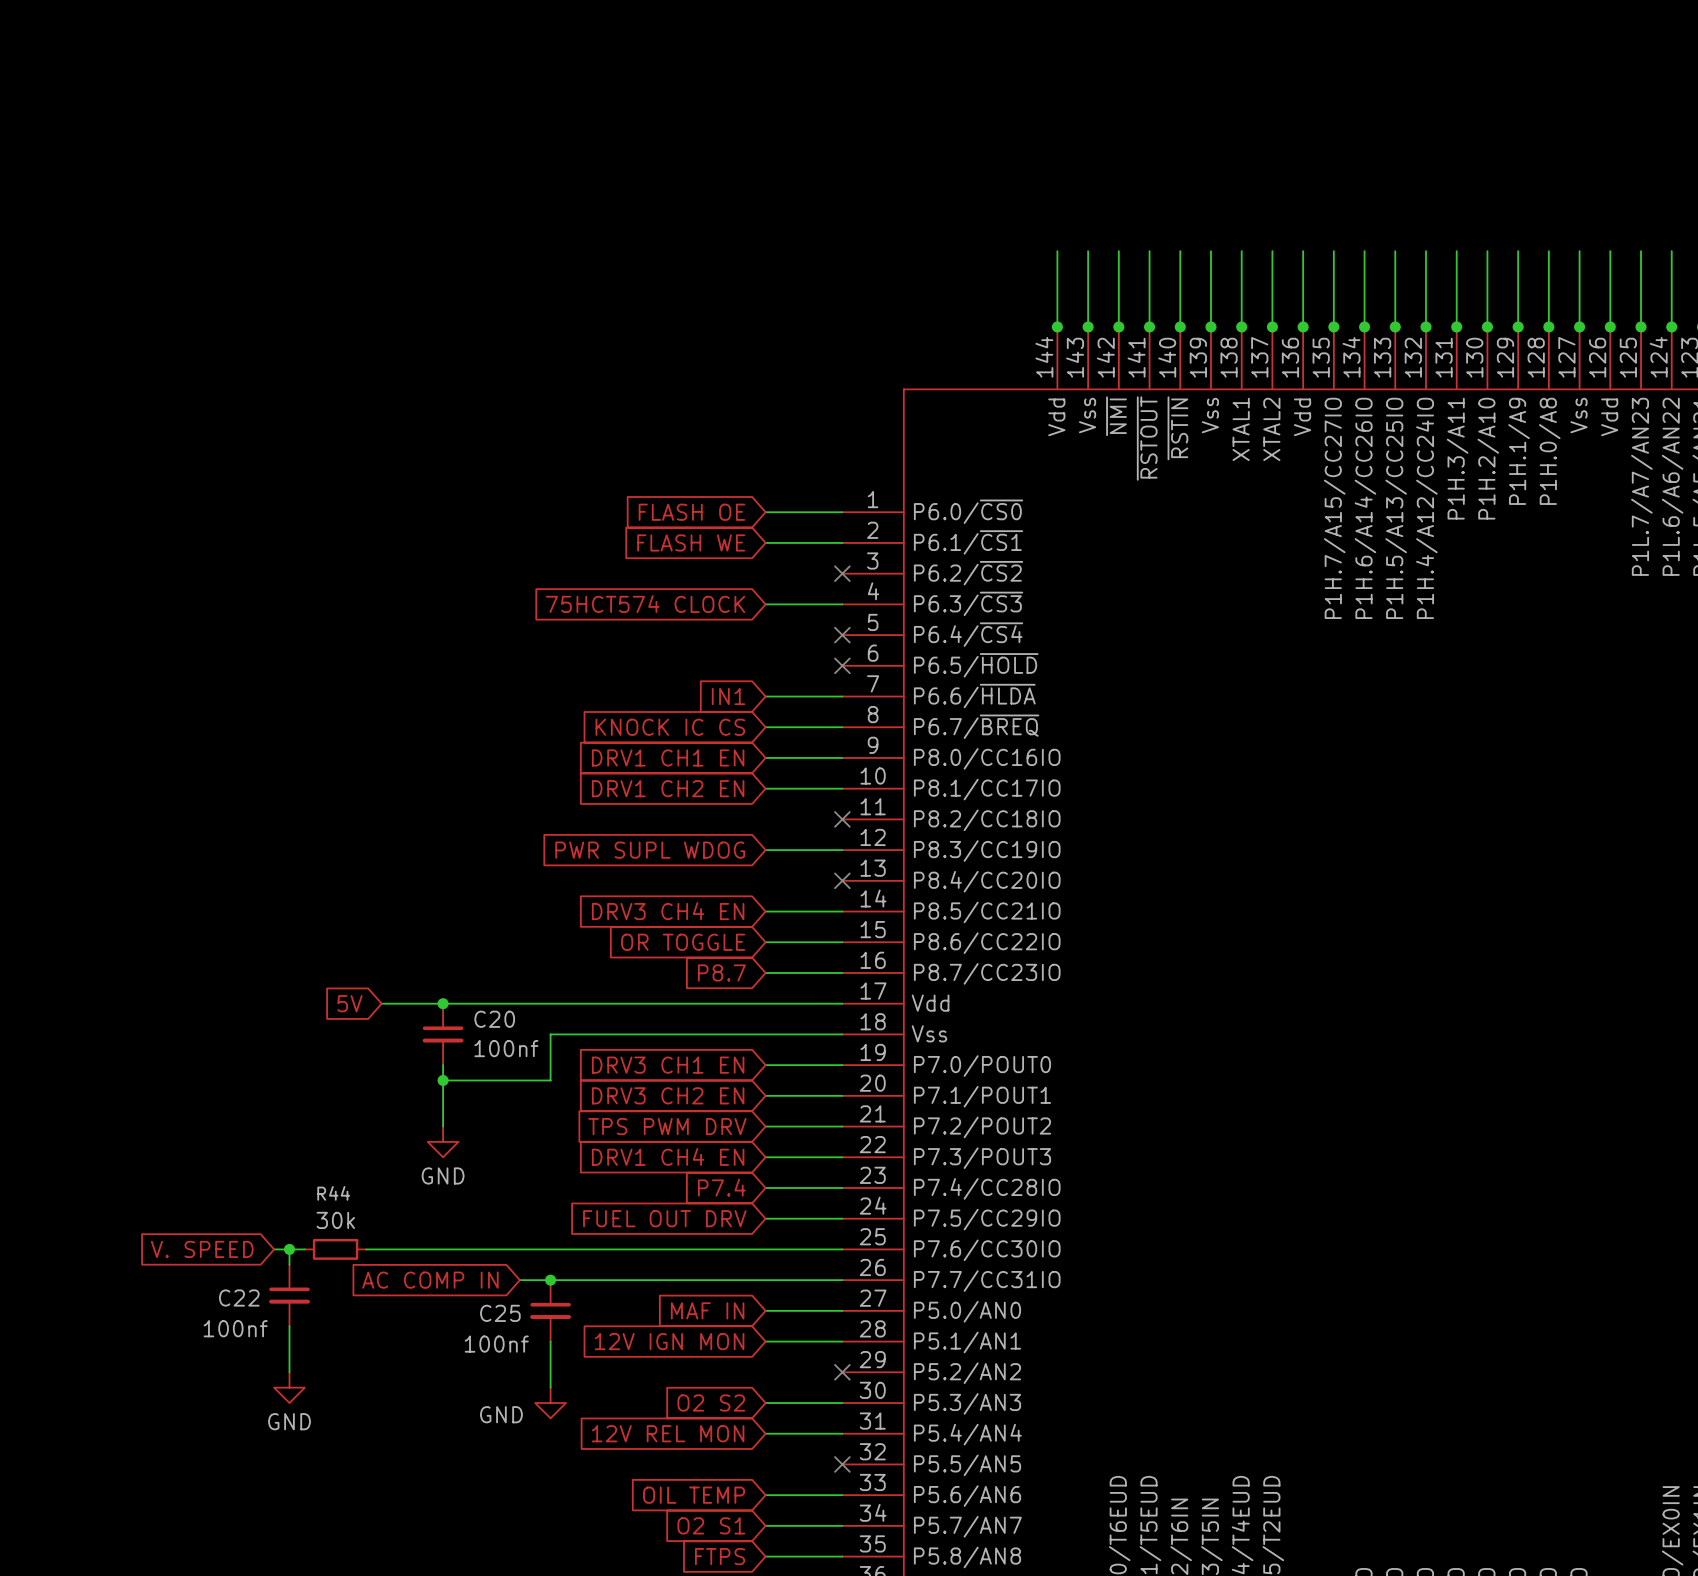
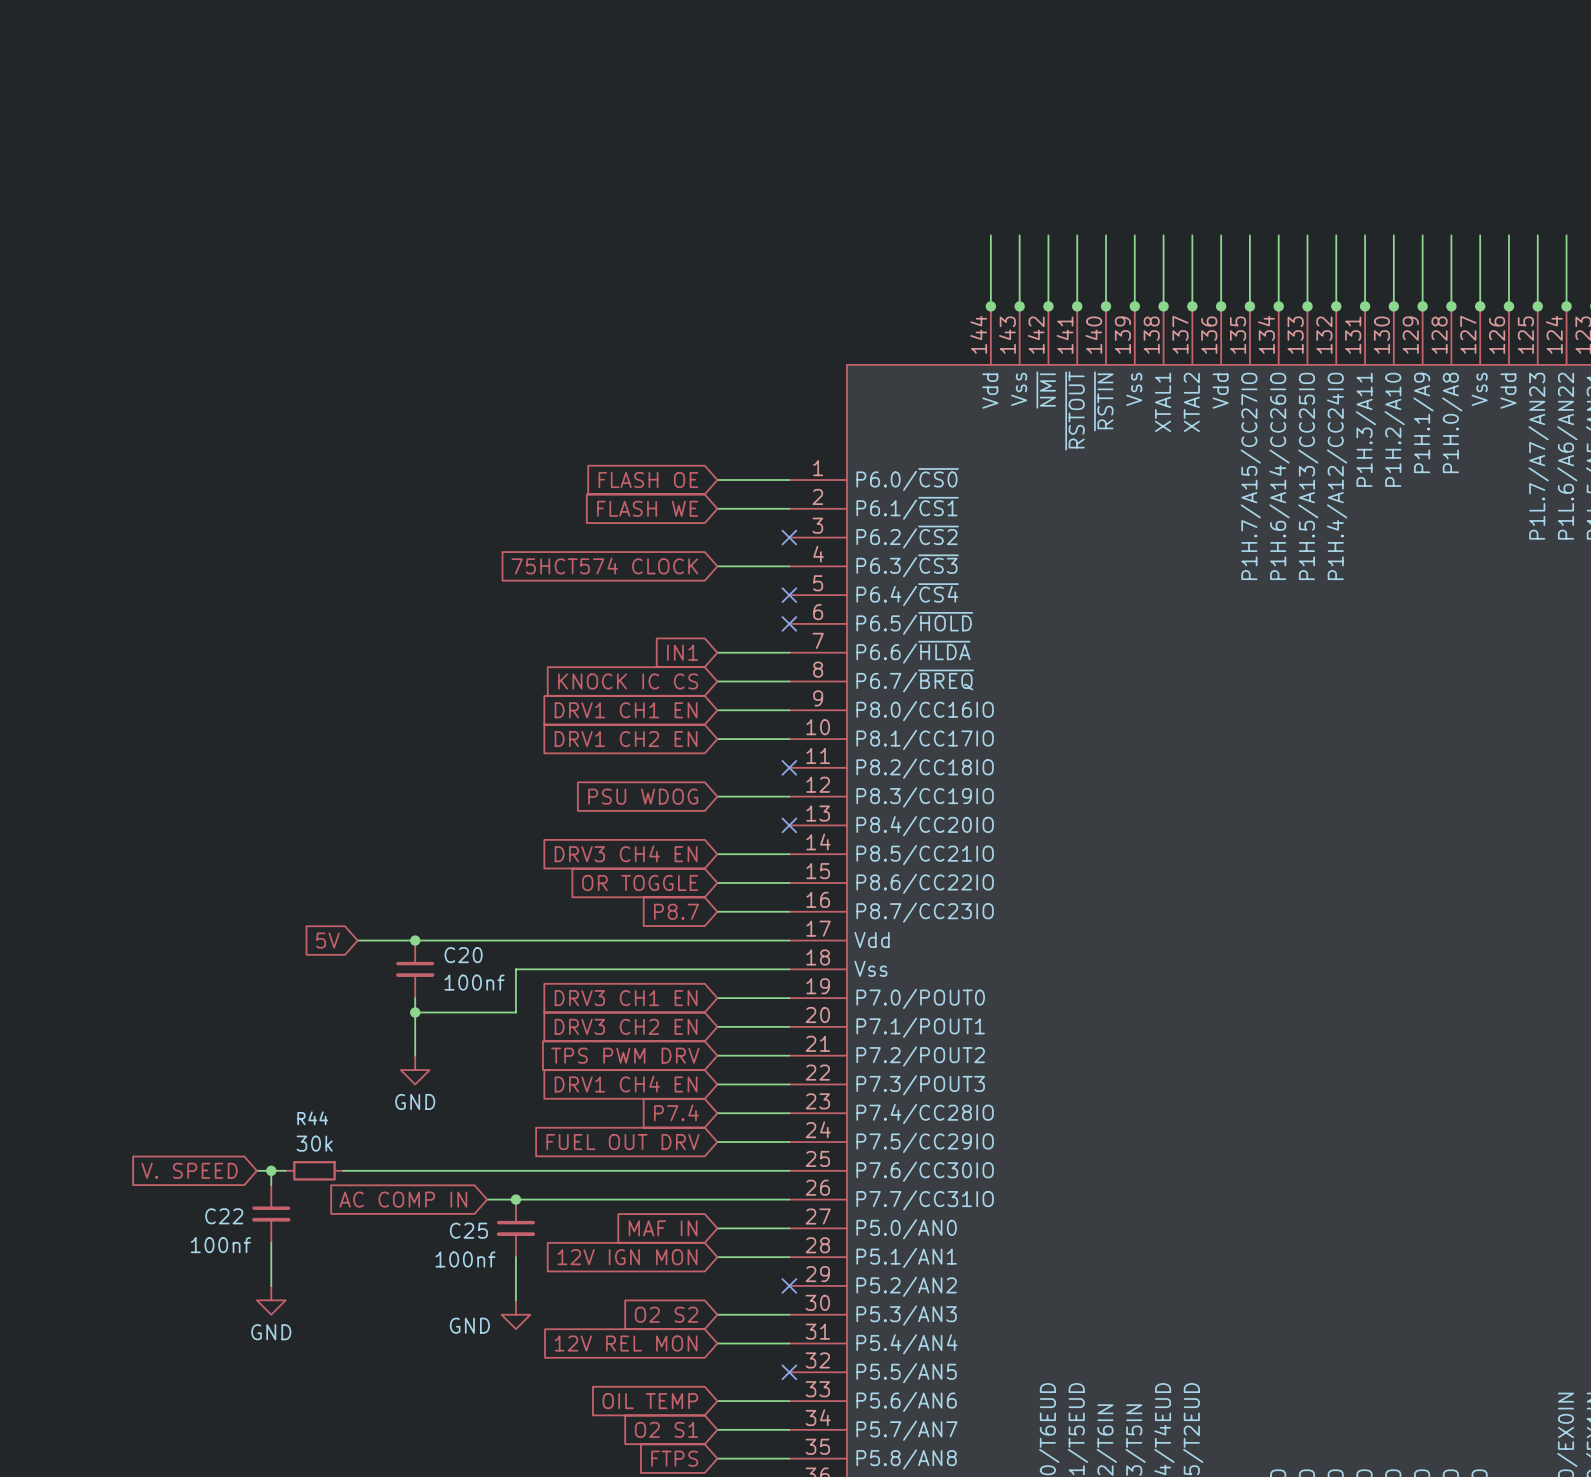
global label: PWR SUPL WDOG (650, 850) -> PSU WDOG (643, 796)

